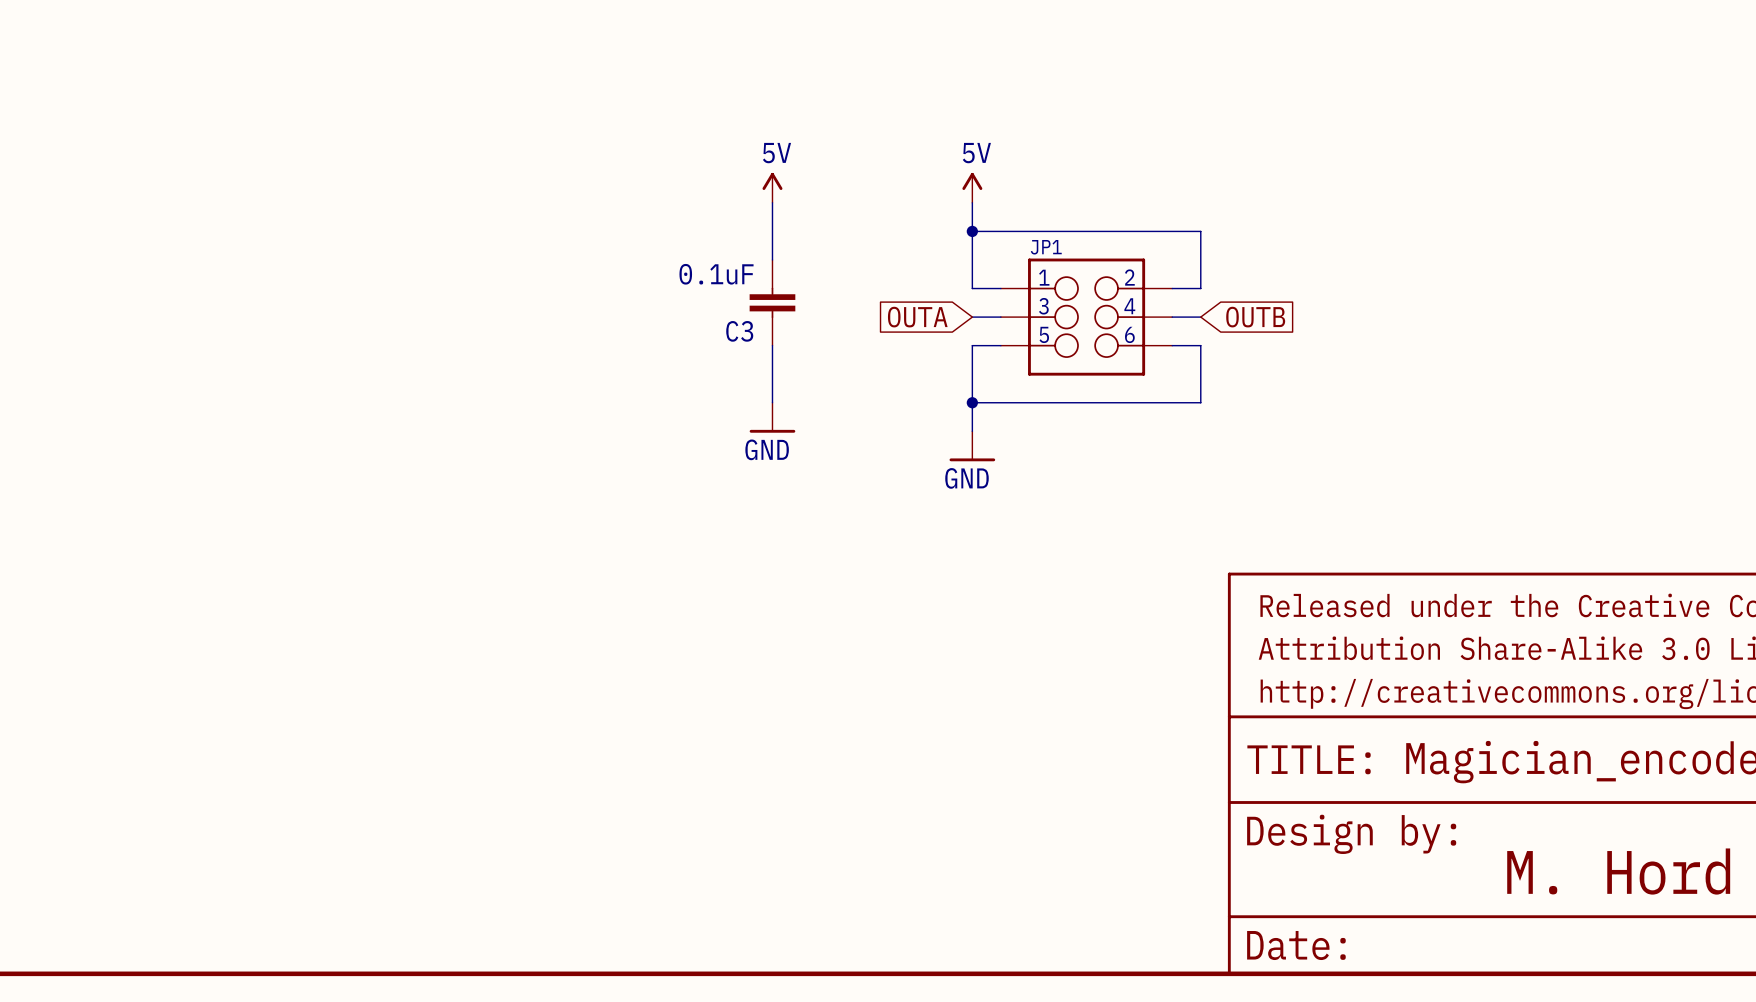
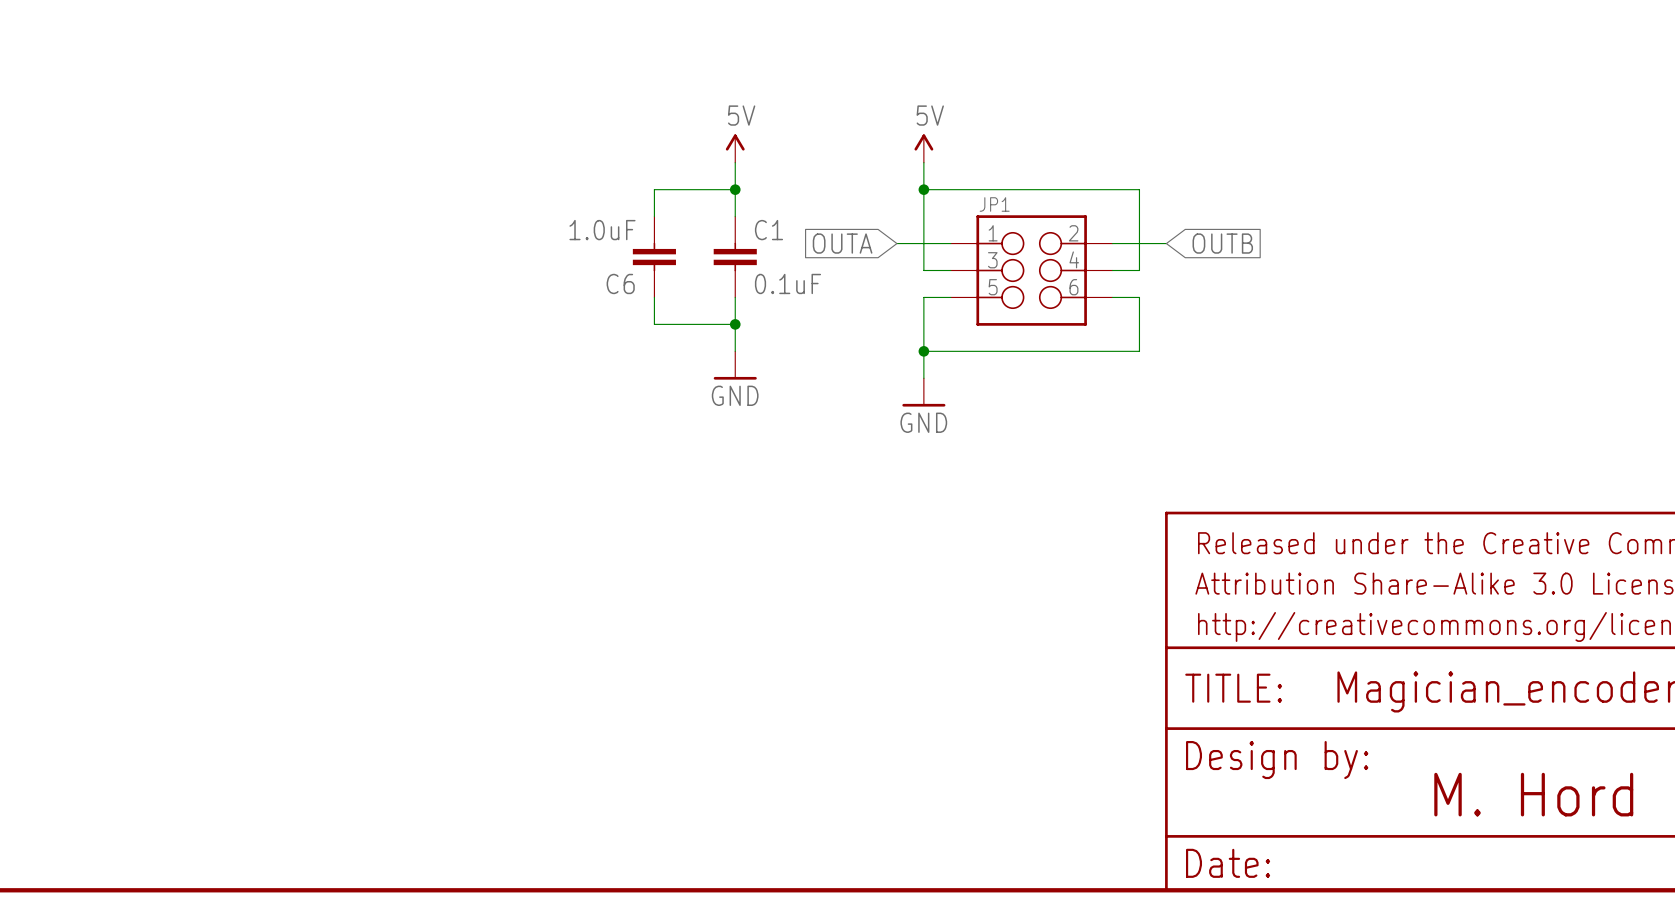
wire: none -> (735, 189) (654, 189) (654, 216)
junction: none -> (735, 189)
C3 value position: 0.1uF (716, 274) -> 0.1uF (787, 283)
wire: none -> (896, 243) (923, 243) (923, 270)
wire: none -> (1166, 243) (1139, 243) (1139, 270)
C6: none -> 1.0uF (654, 257)
global label position: OUTA (917, 317) -> OUTA (842, 243)
global label position: OUTB (1255, 317) -> OUTB (1222, 243)
C3 name: C3 (739, 331) -> C1 (768, 230)
wire: none -> (654, 297) (654, 324) (735, 324)
junction: none -> (735, 324)

